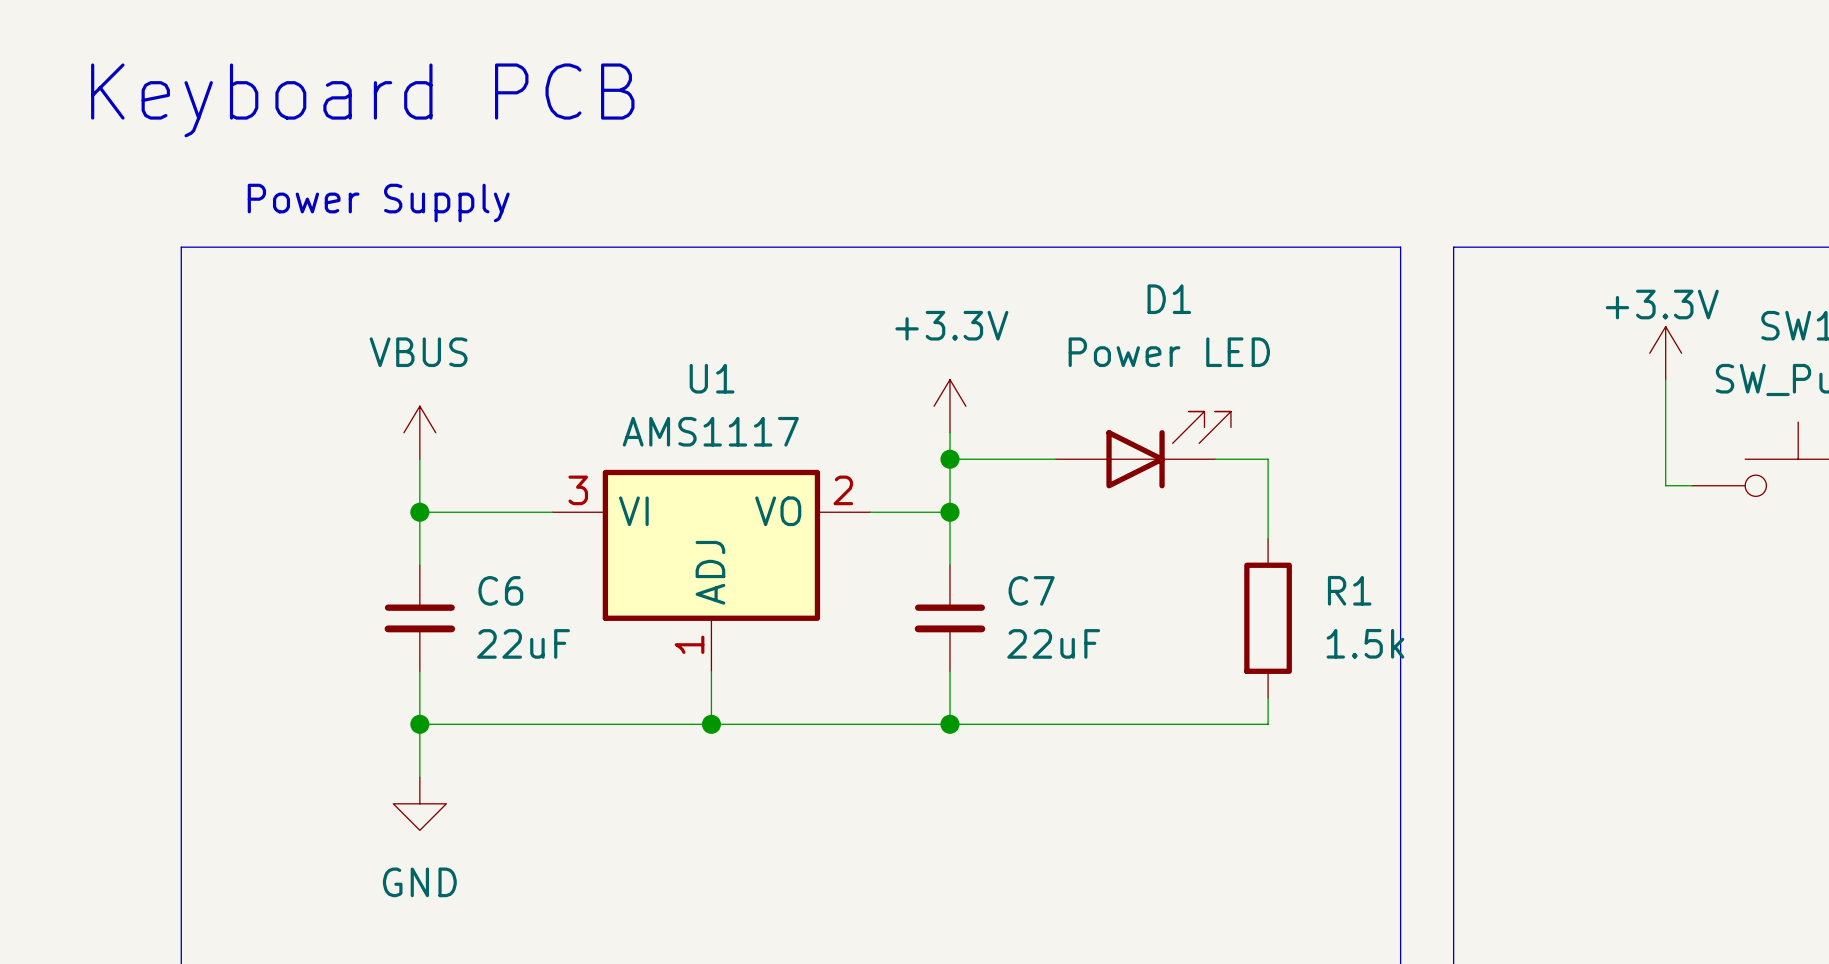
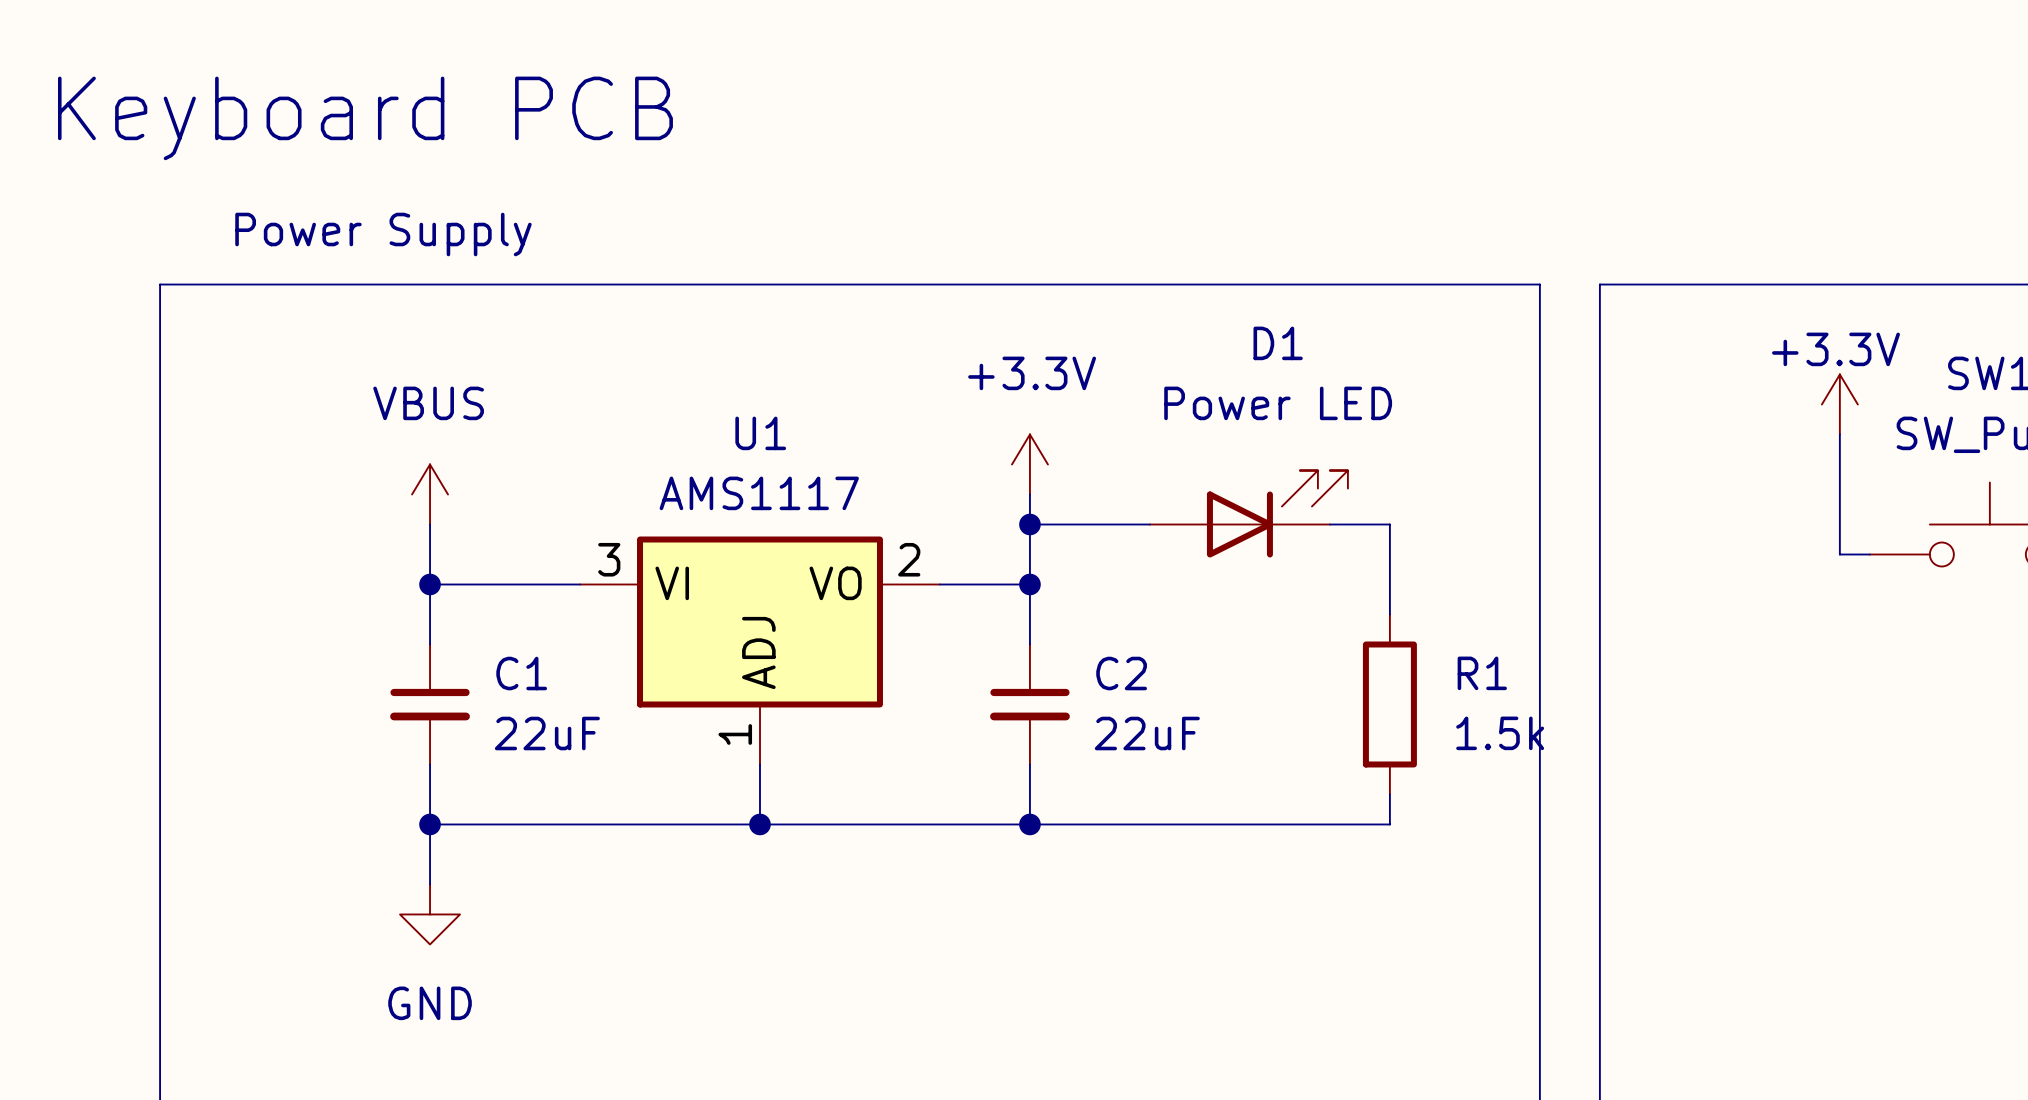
C6 name: C6 (500, 590) -> C1 (521, 673)
C7 name: C7 (1031, 590) -> C2 (1121, 673)

